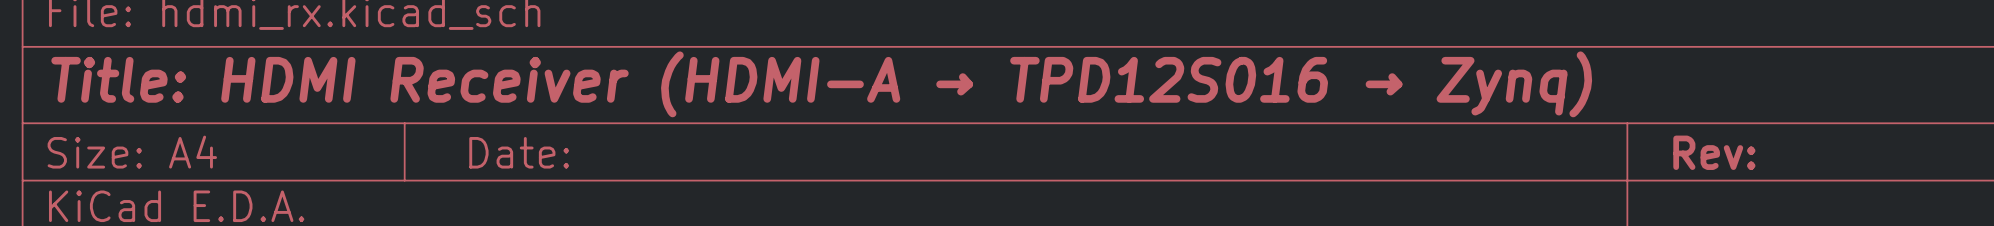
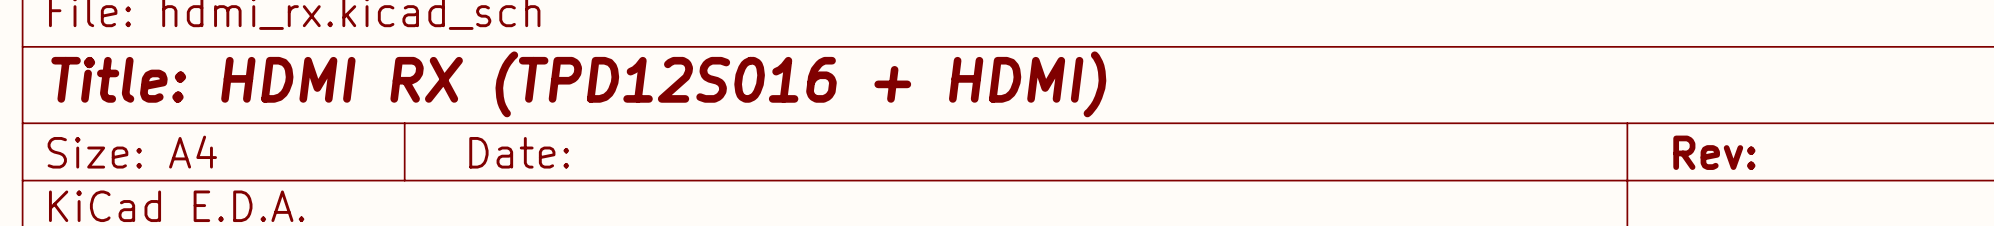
title block: Title: HDMI Receiver (HDMI-A → TPD12S016 → Zynq) (821, 84) -> Title: HDMI RX (TPD12S016 + HDMI) (578, 84)

